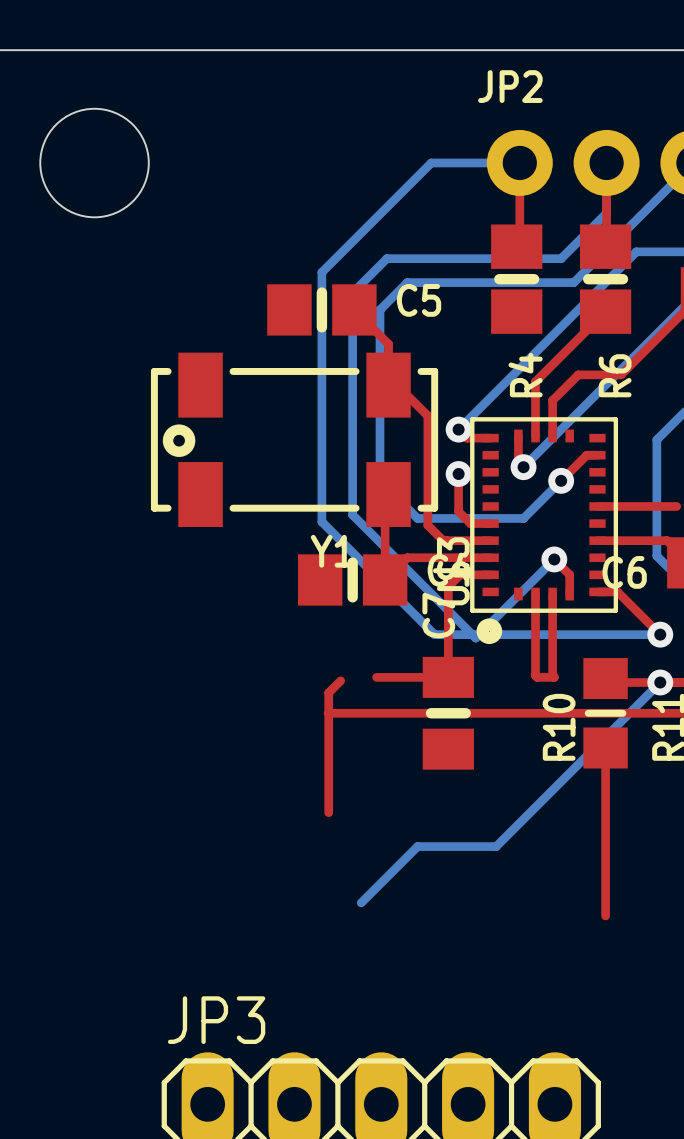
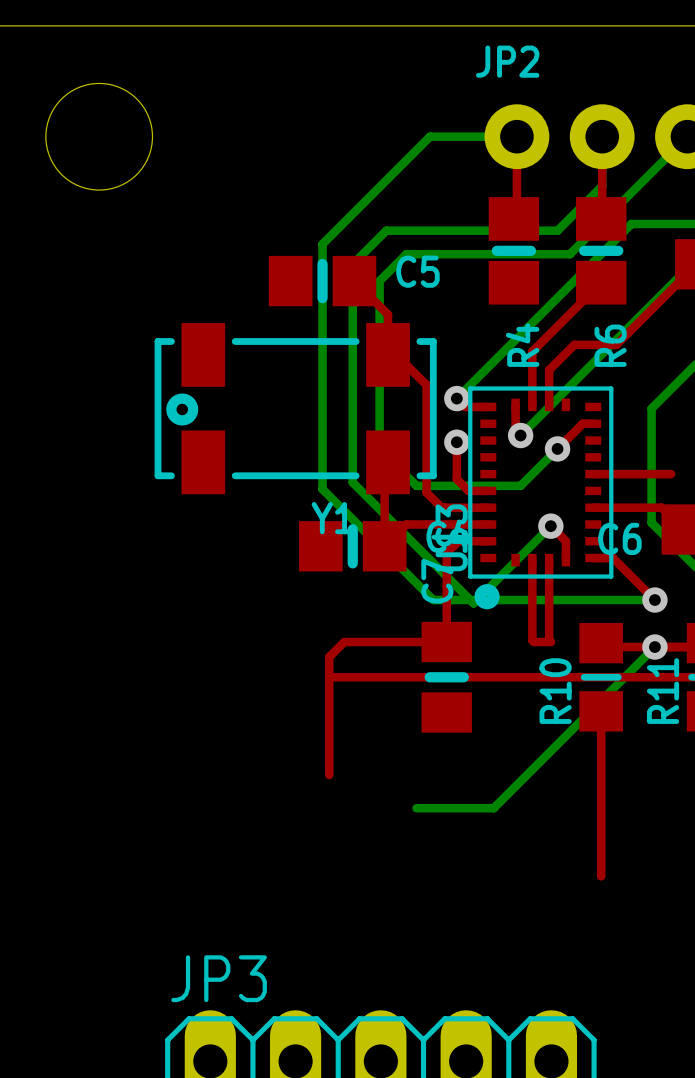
top track: none -> (376, 642) (344, 642) (341, 645)
bottom track: (417, 846) (361, 902) -> none

